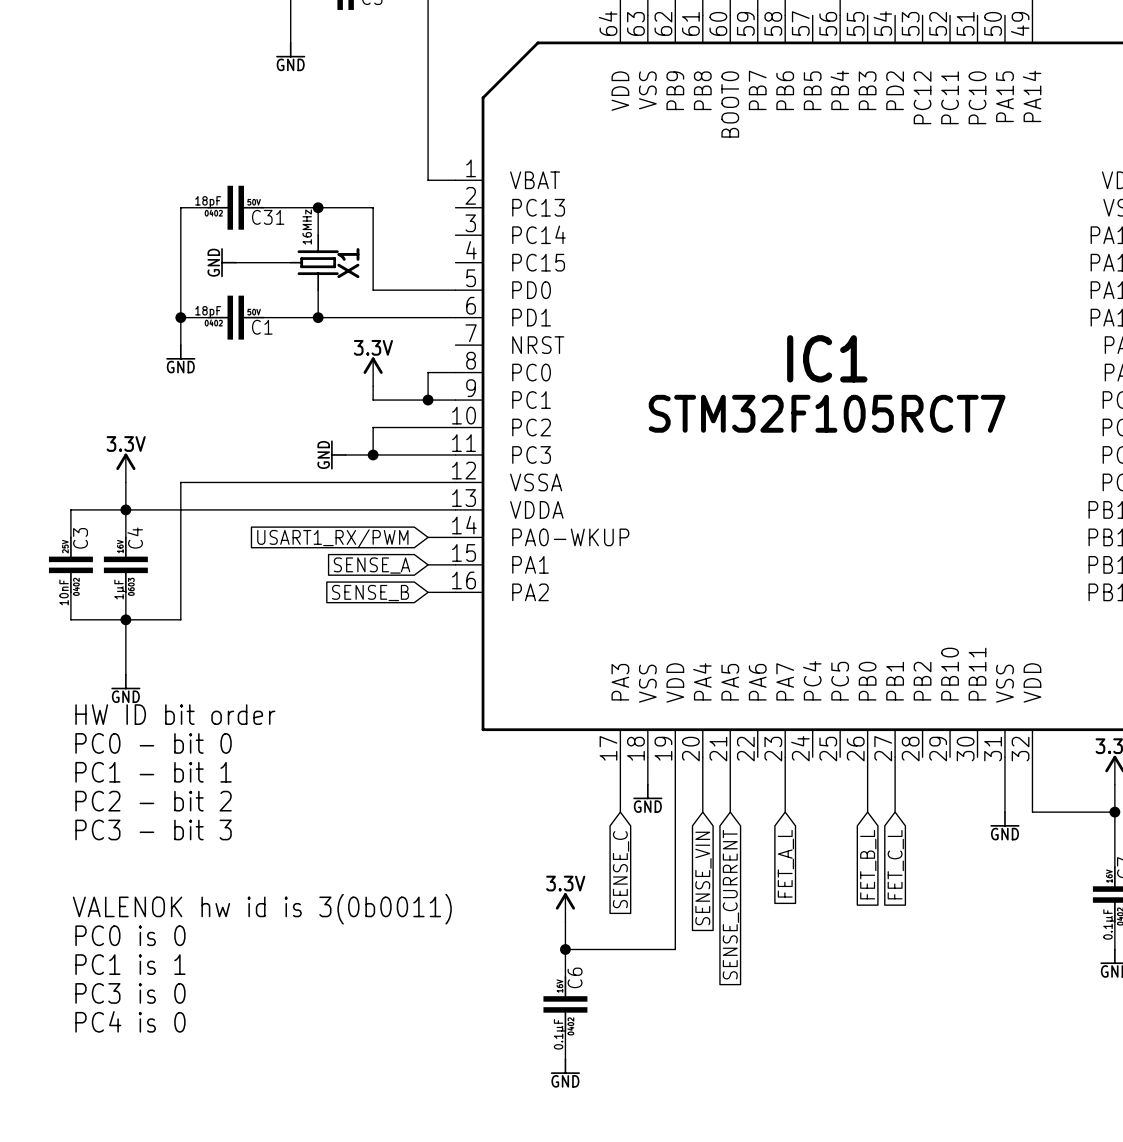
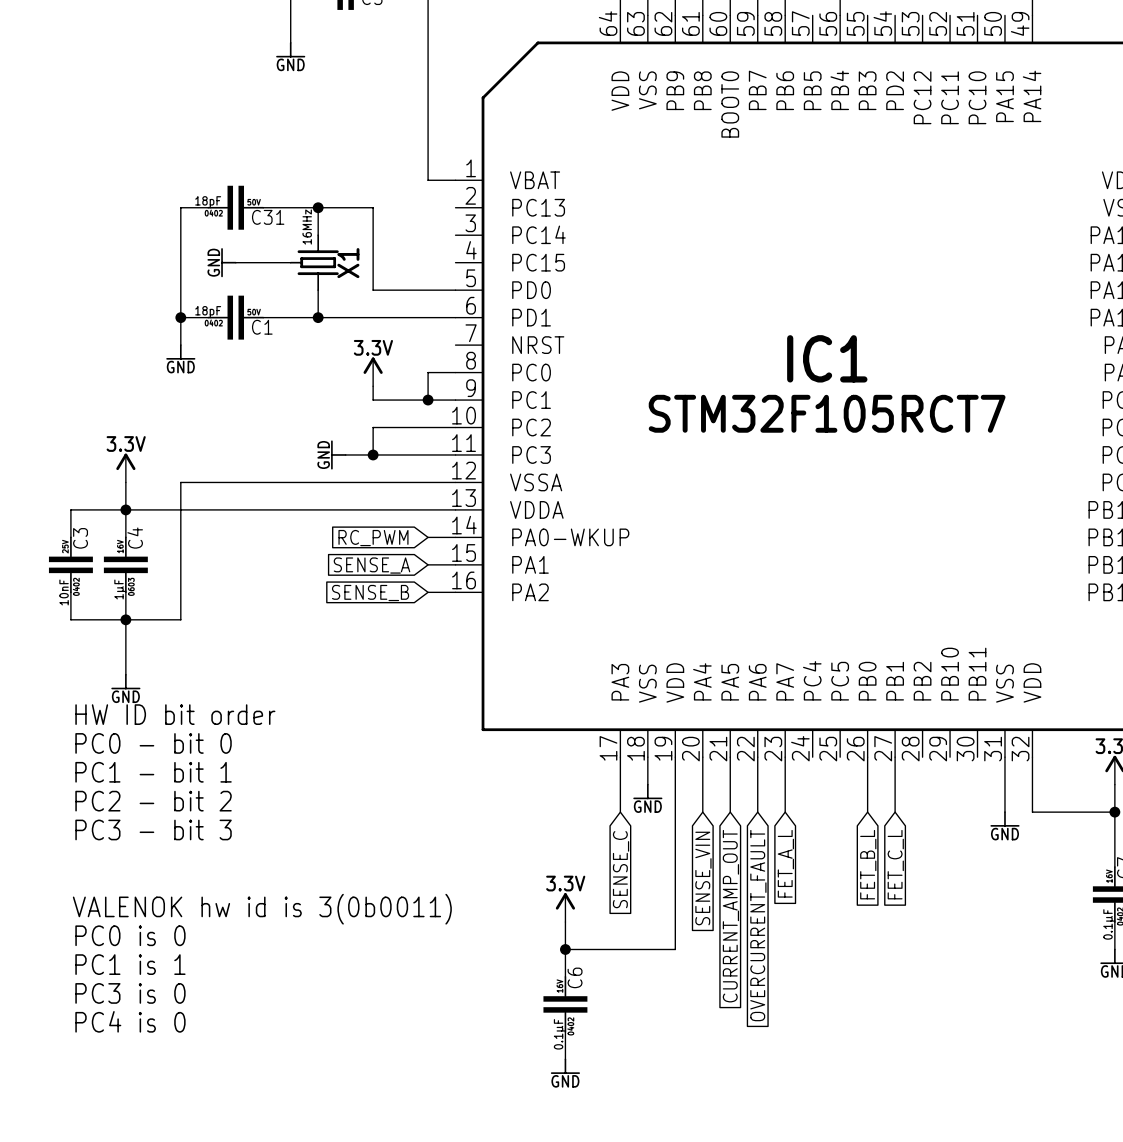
global label: USART1_RX/PWM (332, 538) -> RC_PWM (373, 538)
wire: none -> (757, 757) (757, 812)
global label: SENSE_CURRENT (730, 904) -> CURRENT_AMP_OUT (730, 916)
global label: none -> OVERCURRENT_FAULT (758, 925)

